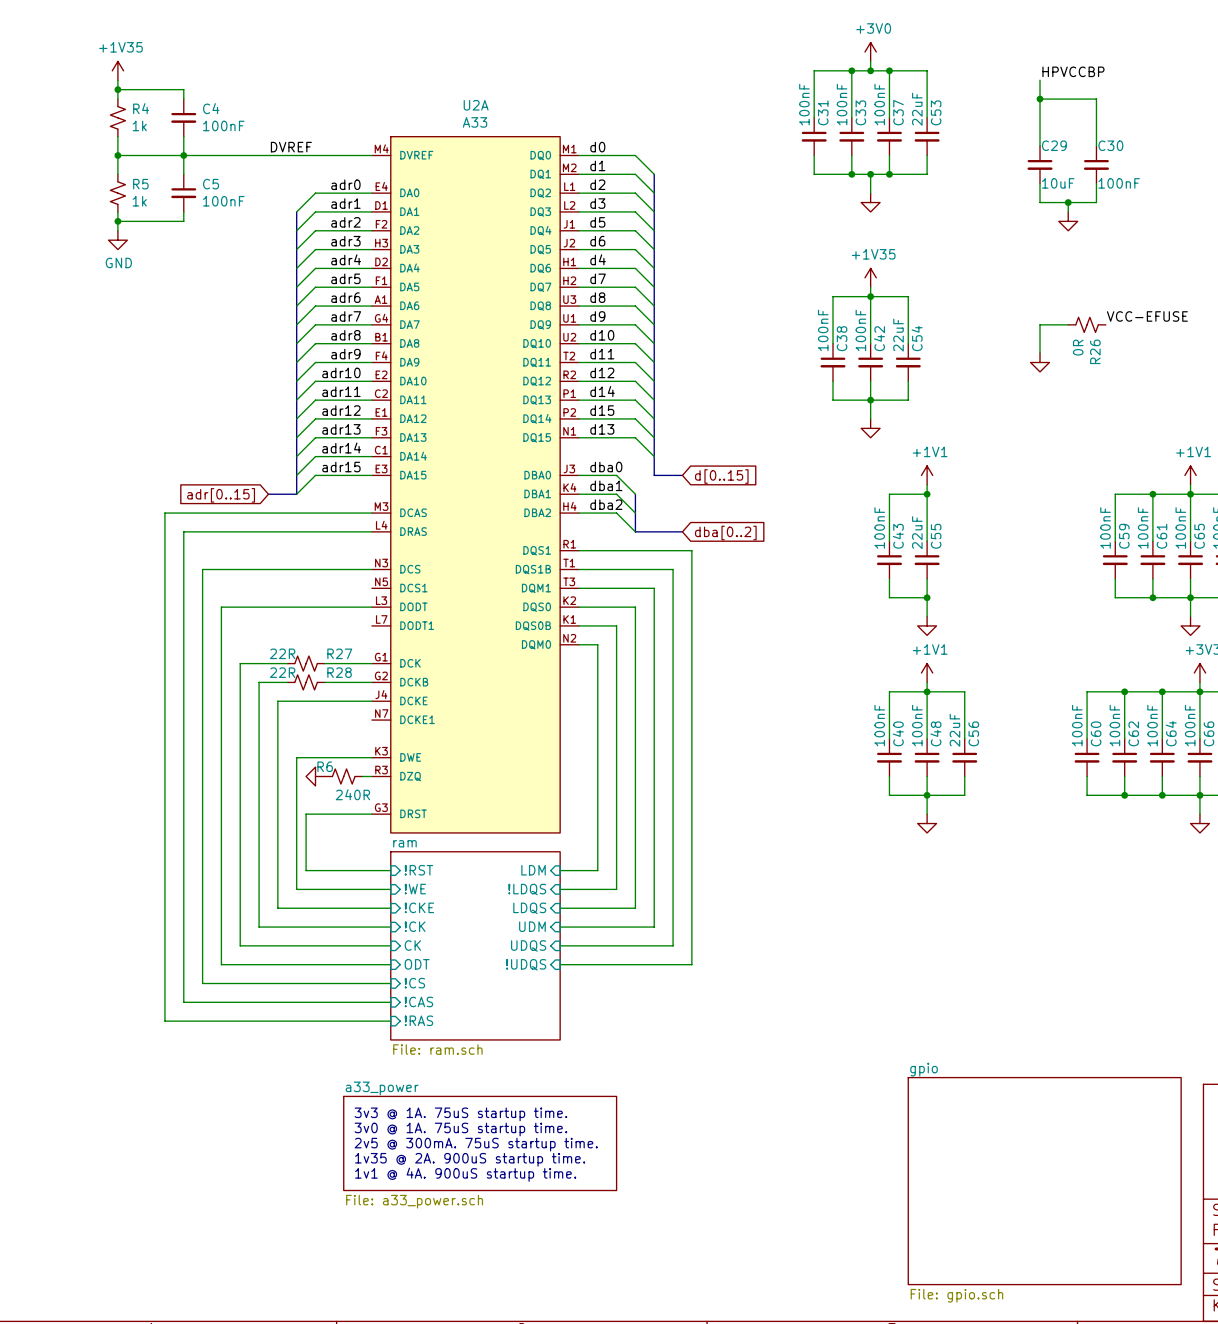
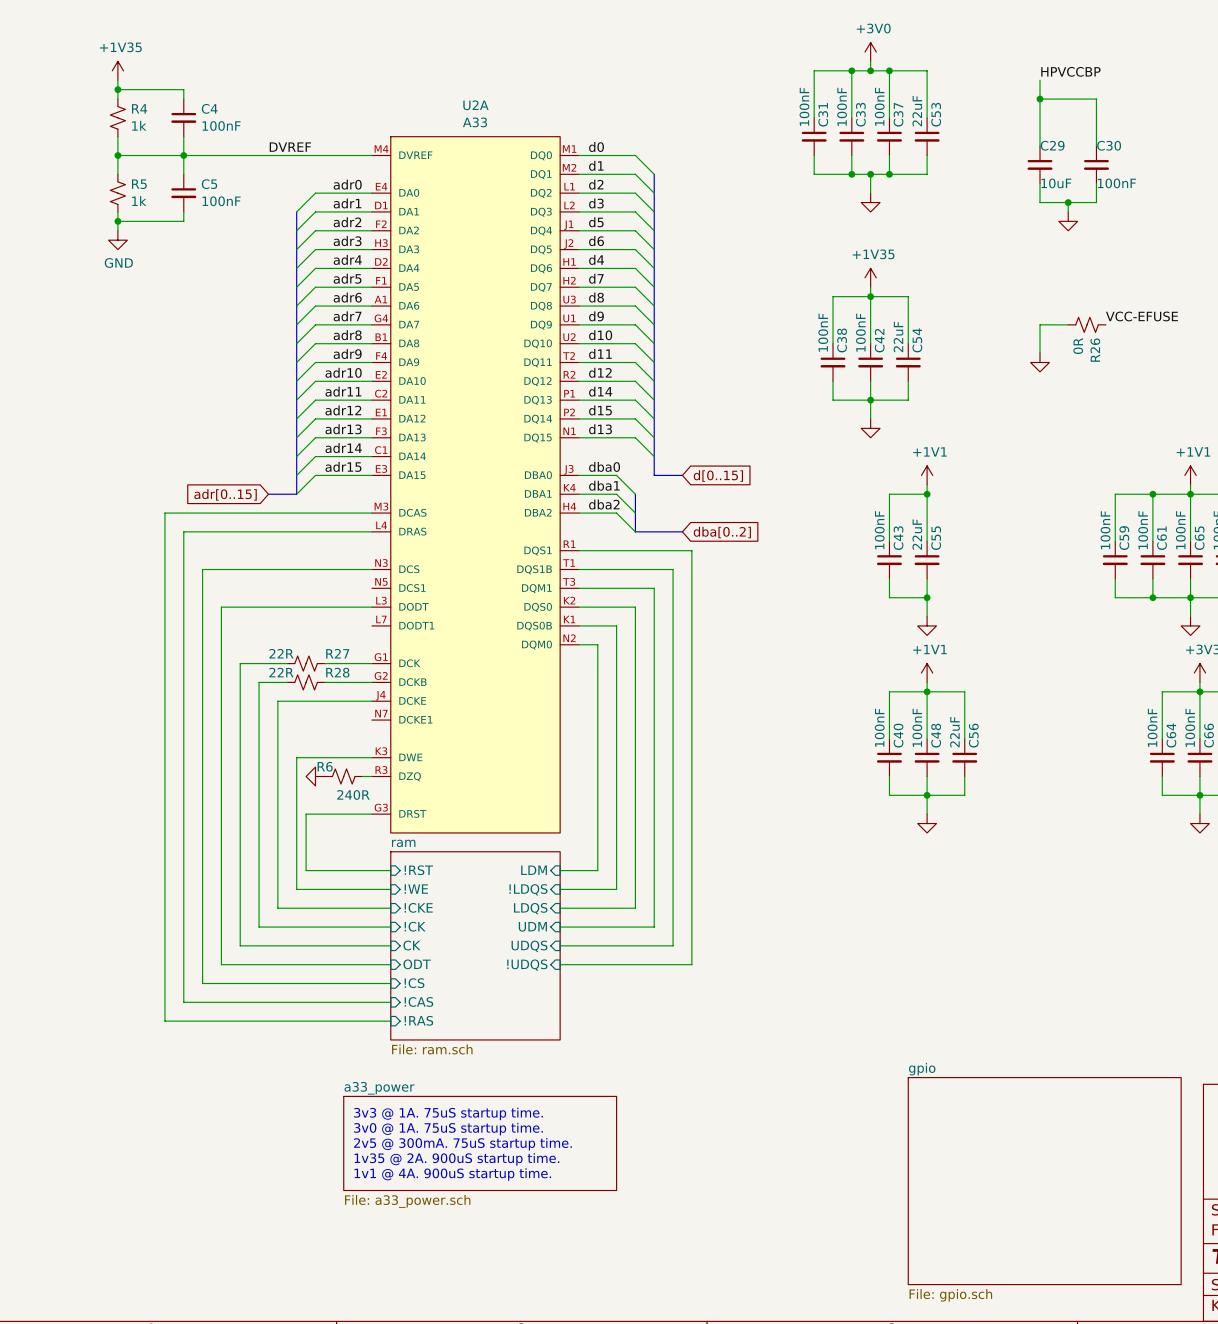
wire: (1124, 691) (1124, 738) -> none
junction: (1124, 691) -> none
wire: (1162, 691) (1087, 691) (1087, 738) -> none
junction: (1162, 691) -> none
C60: 100nF (1087, 757) -> none
C62: 100nF (1124, 757) -> none
wire: (1087, 776) (1087, 795) (1162, 795) -> none
wire: (1124, 776) (1124, 795) -> none
junction: (1124, 795) -> none
junction: (1162, 795) -> none

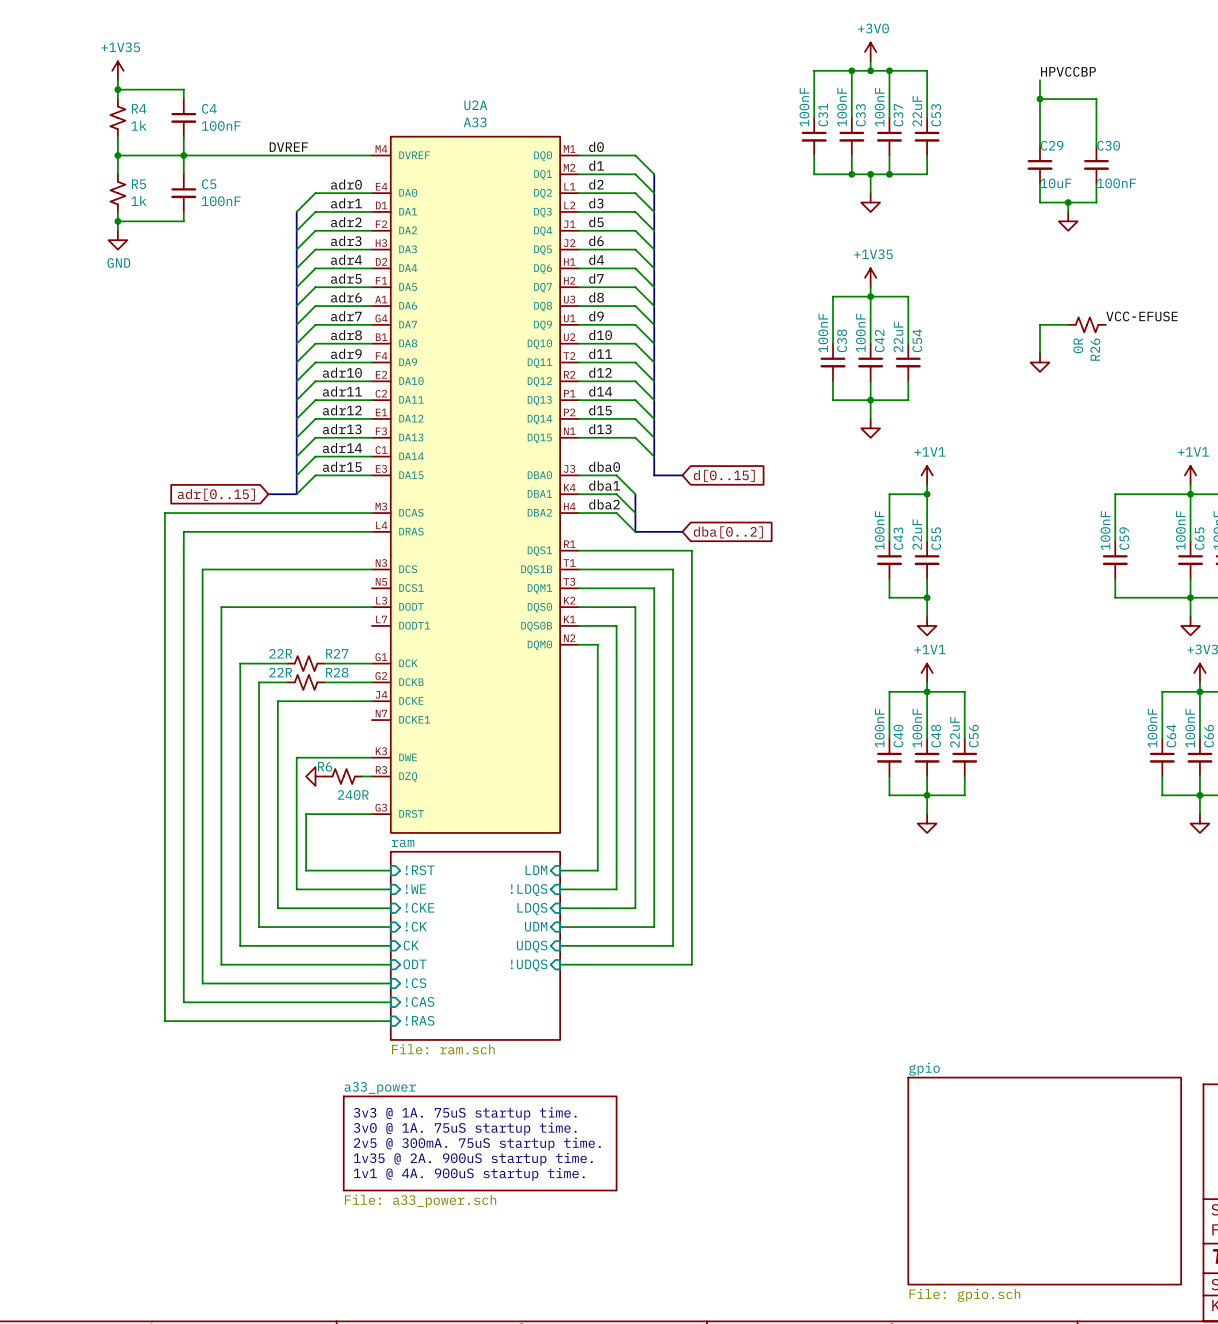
wire: (1152, 494) (1152, 541) -> none
junction: (1152, 494) -> none
C61: 100nF (1152, 560) -> none
wire: (1152, 578) (1152, 597) -> none
junction: (1152, 597) -> none

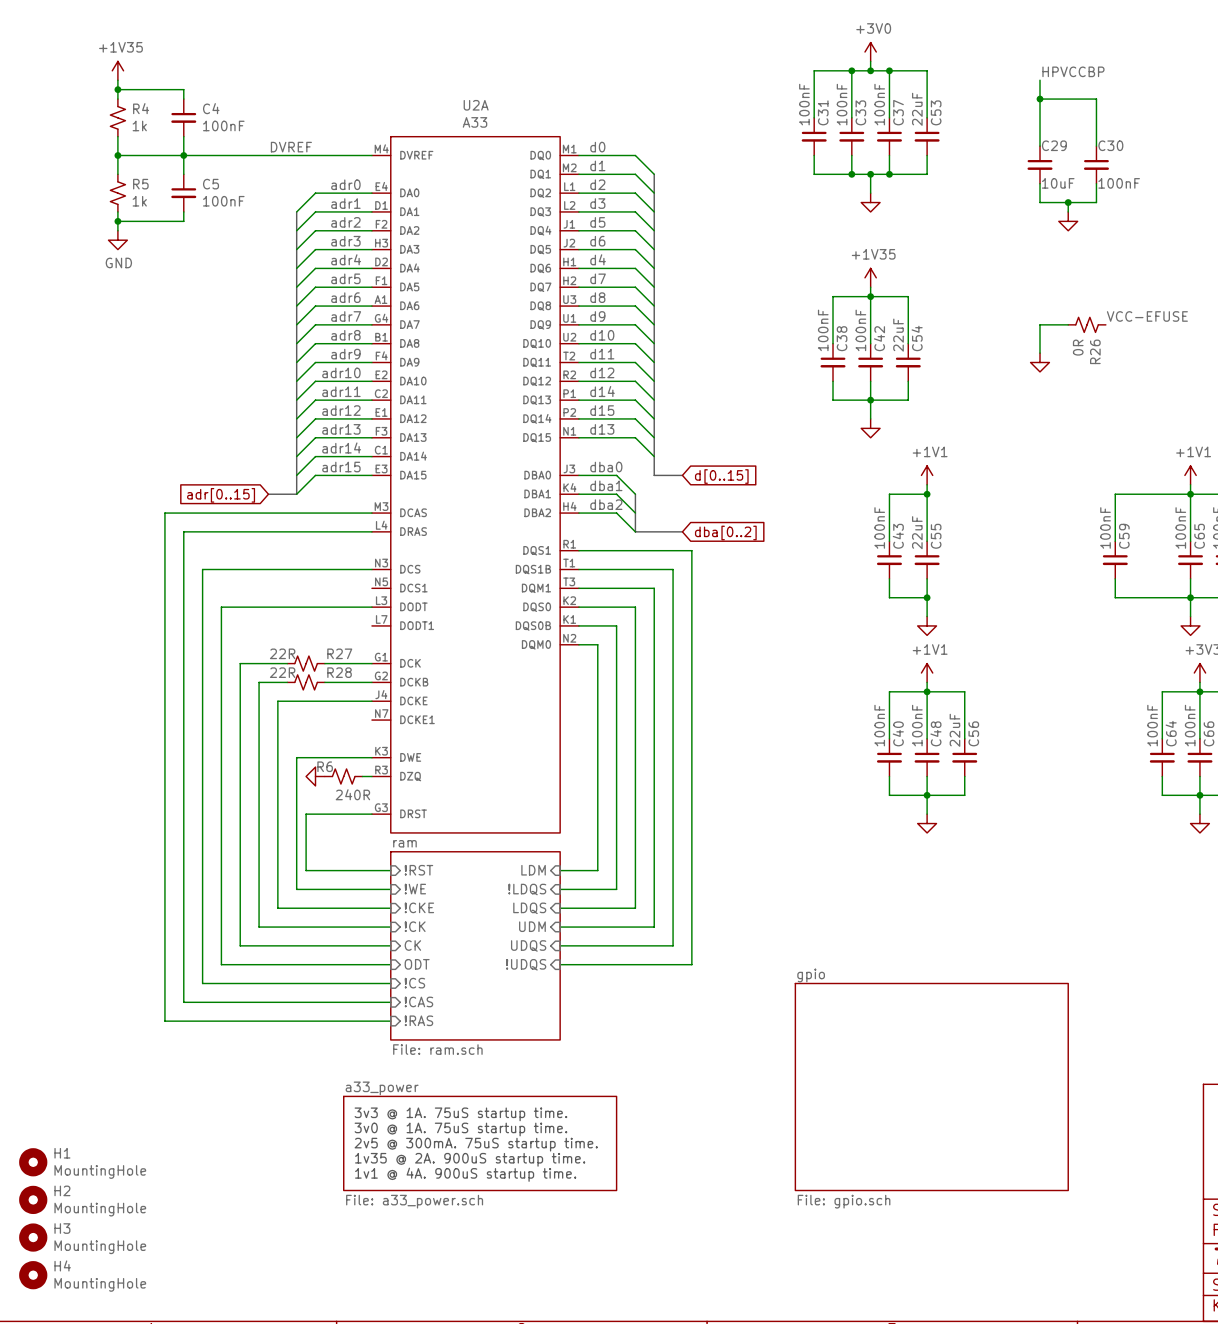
H1: none -> MountingHole (33, 1162)
sheet gpio position: (1044, 1181) -> (931, 1087)
H2: none -> MountingHole (33, 1199)
H3: none -> MountingHole (33, 1237)
H4: none -> MountingHole (33, 1275)

